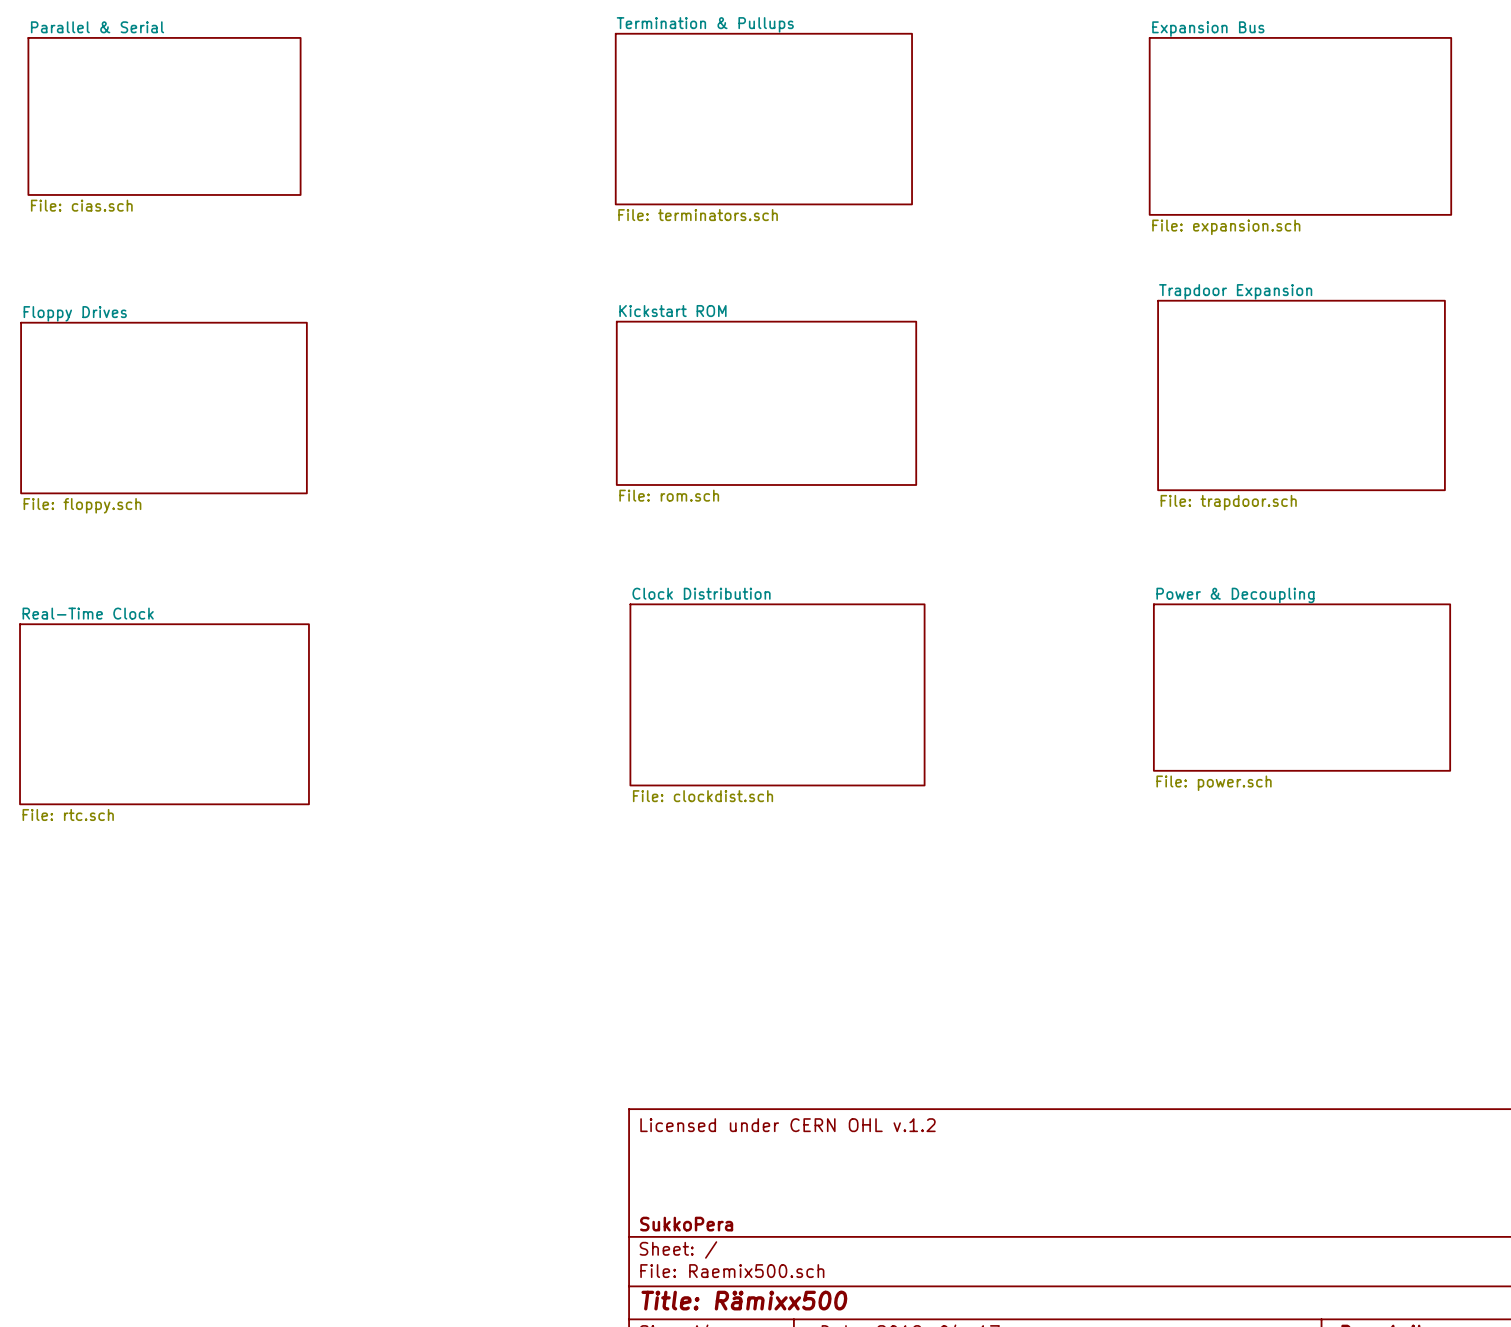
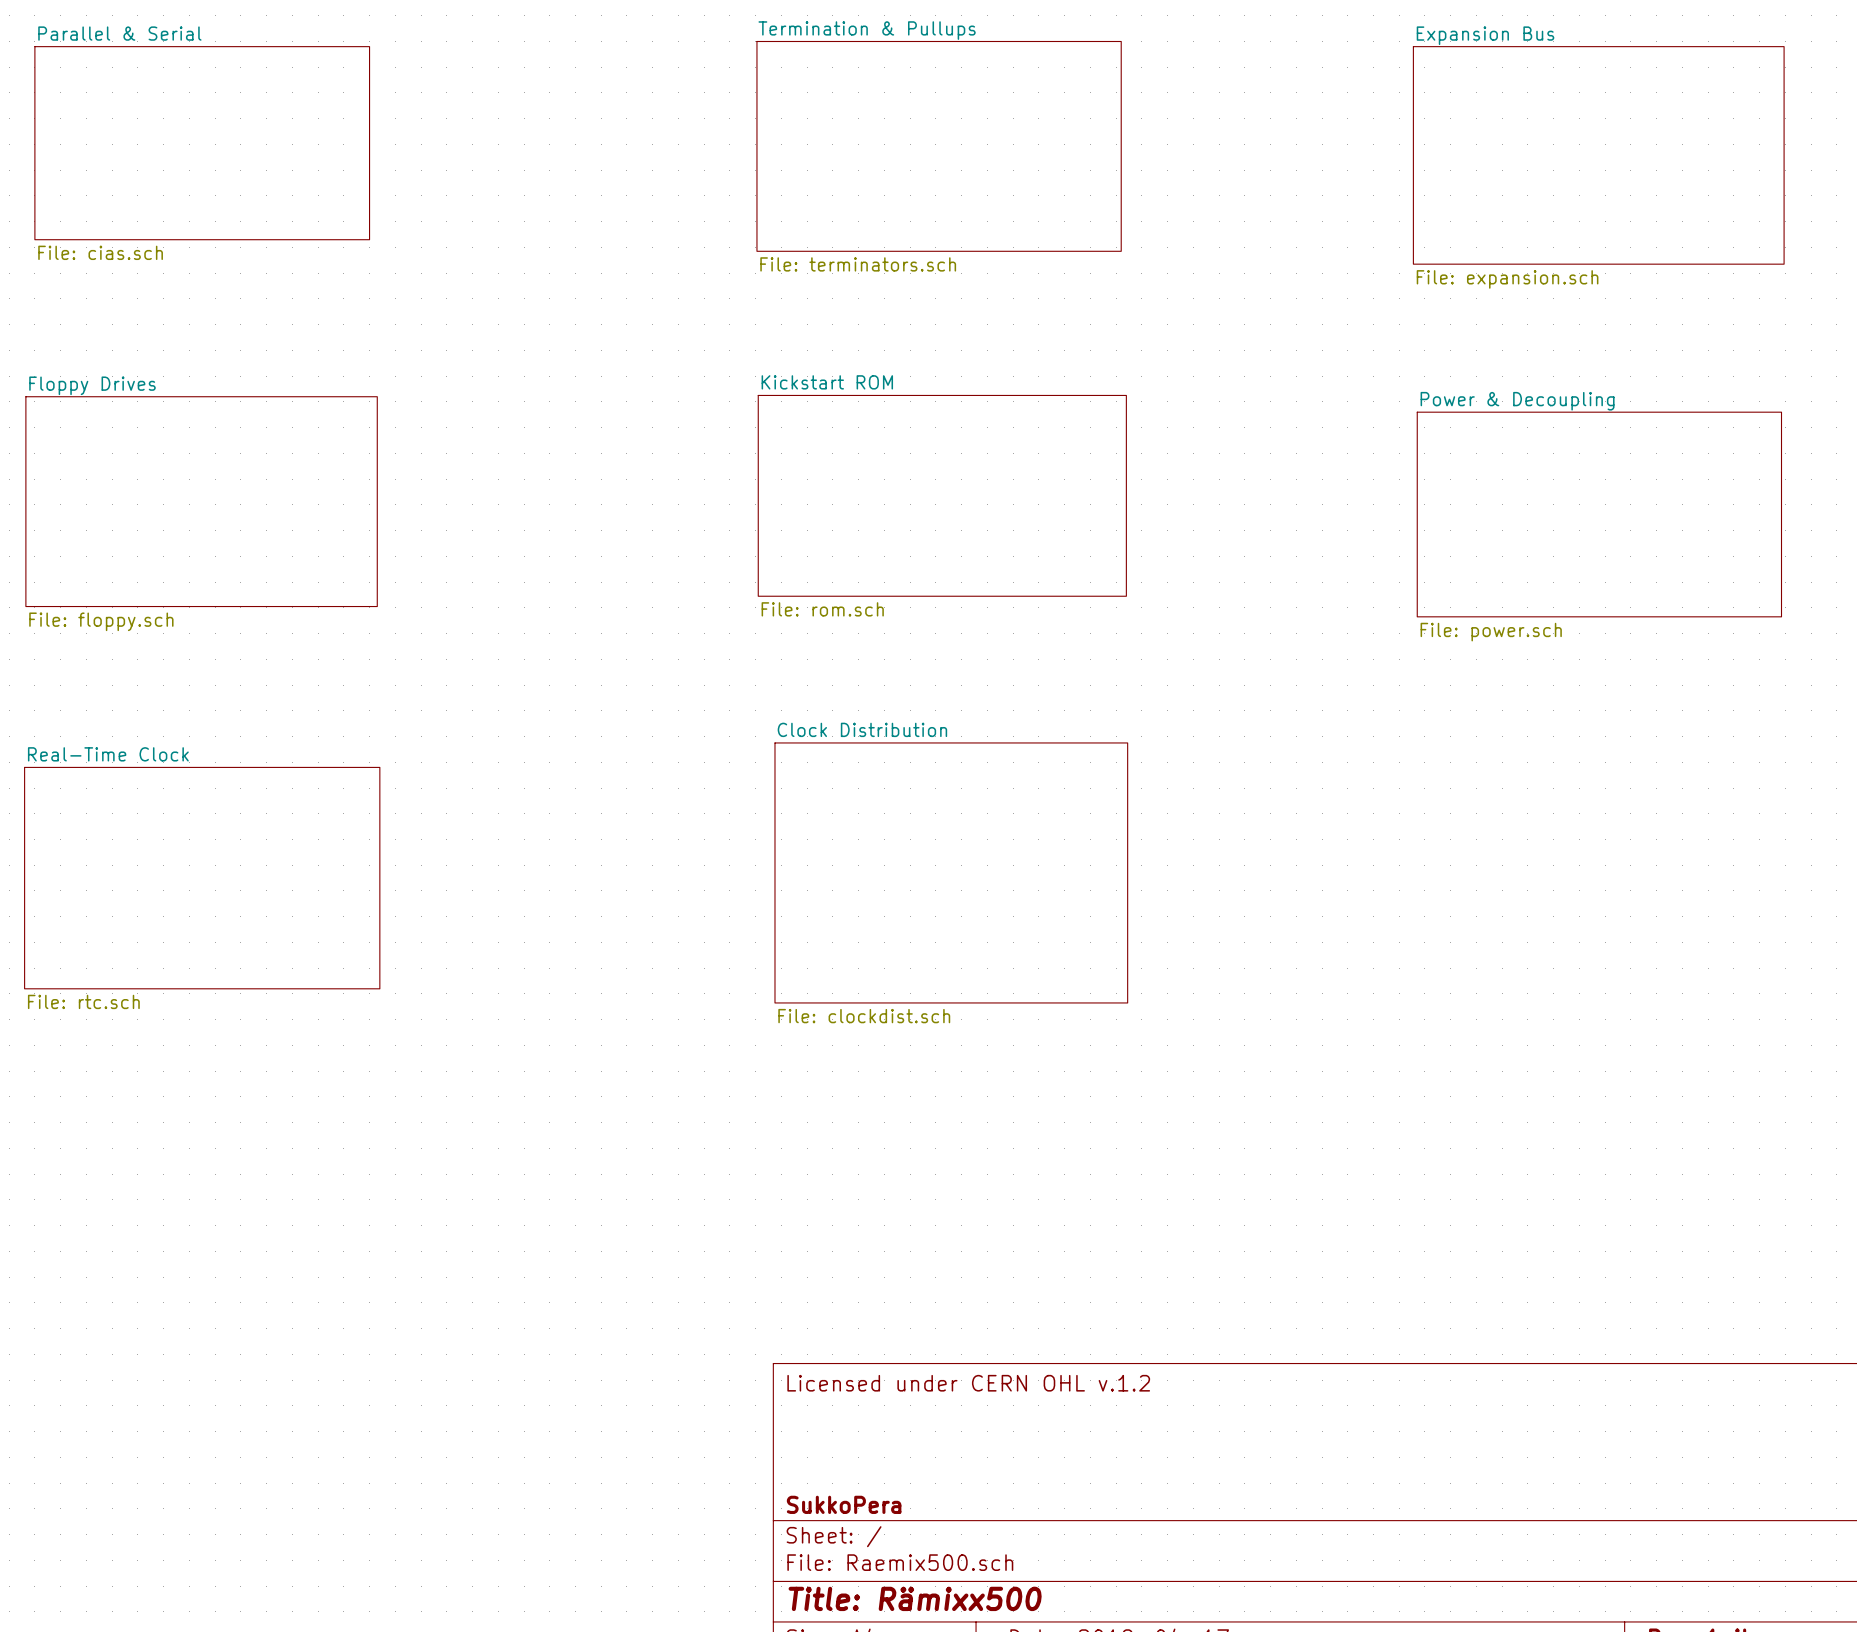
sheet Trapdoor Expansion: File: trapdoor.sch (1301, 395) -> none
sheet Power & Decoupling: none -> File: power.sch (1599, 514)
sheet Power & Decoupling: File: power.sch (1302, 687) -> none
sheet Clock Distribution: File: clockdist.sch (777, 694) -> none
sheet Clock Distribution: none -> File: clockdist.sch (951, 872)

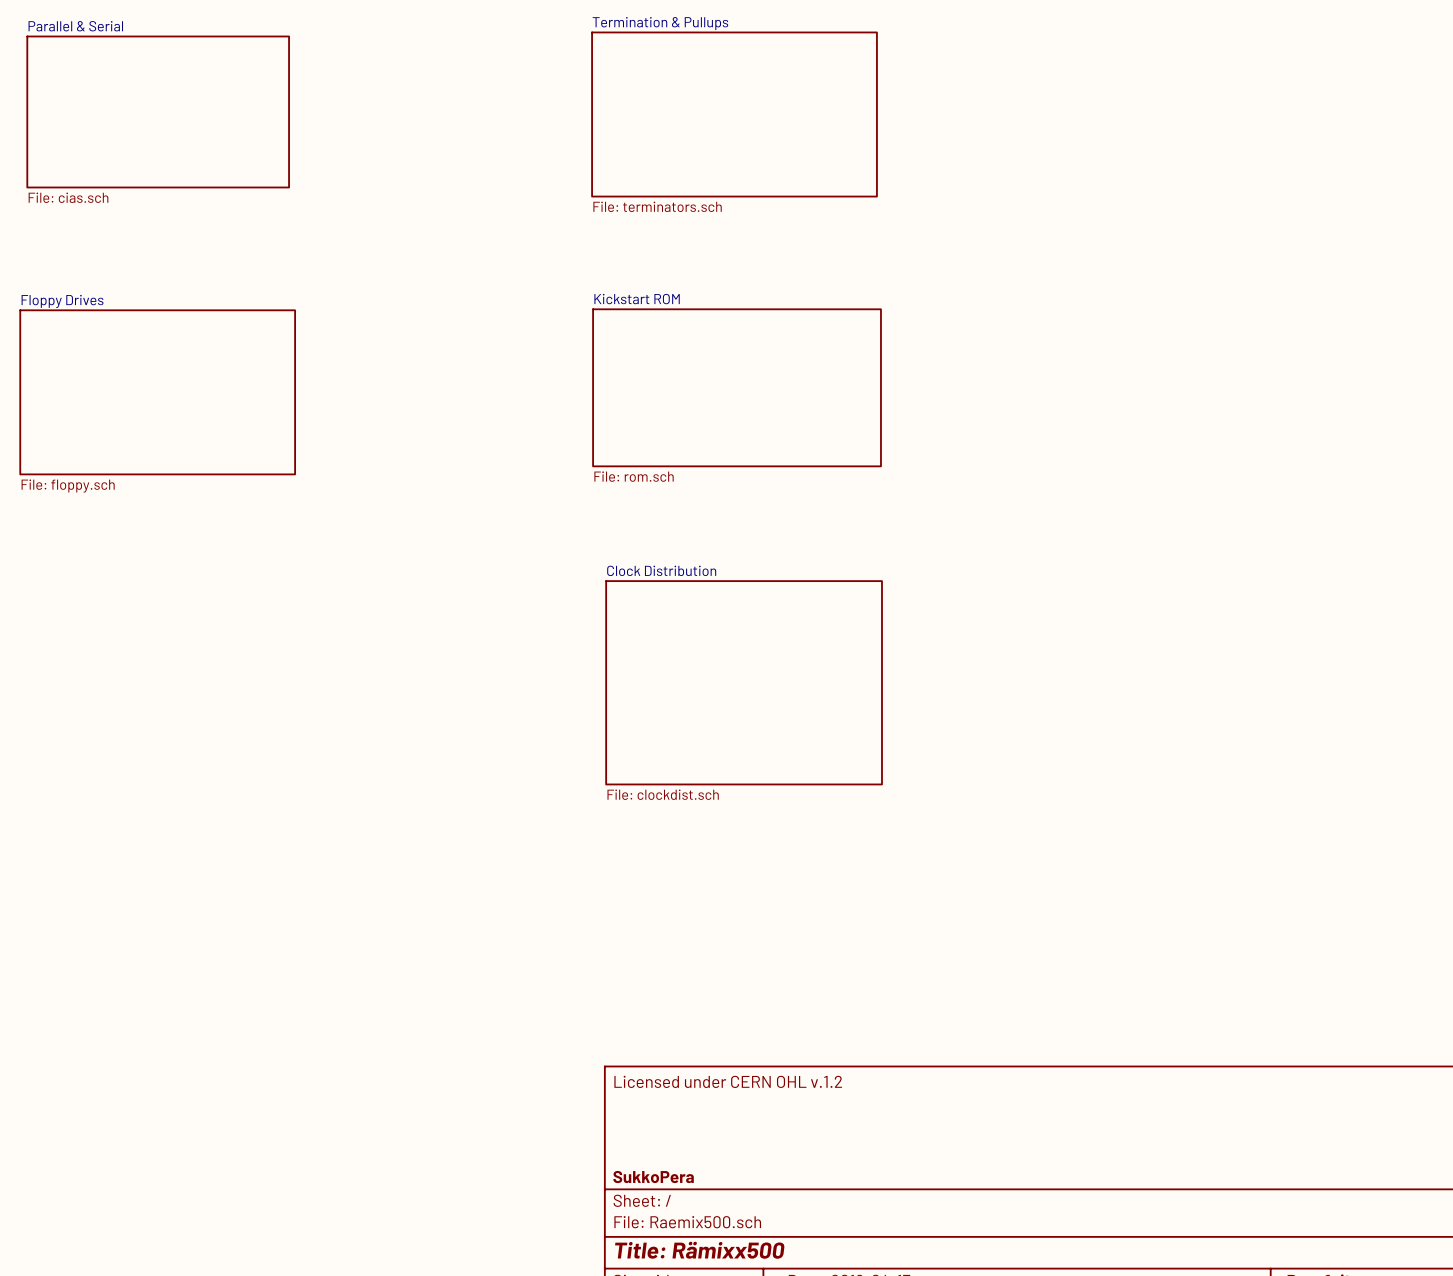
sheet Expansion Bus: File: expansion.sch (1598, 155) -> none
sheet Power & Decoupling: File: power.sch (1599, 514) -> none
sheet Real-Time Clock: File: rtc.sch (202, 878) -> none

